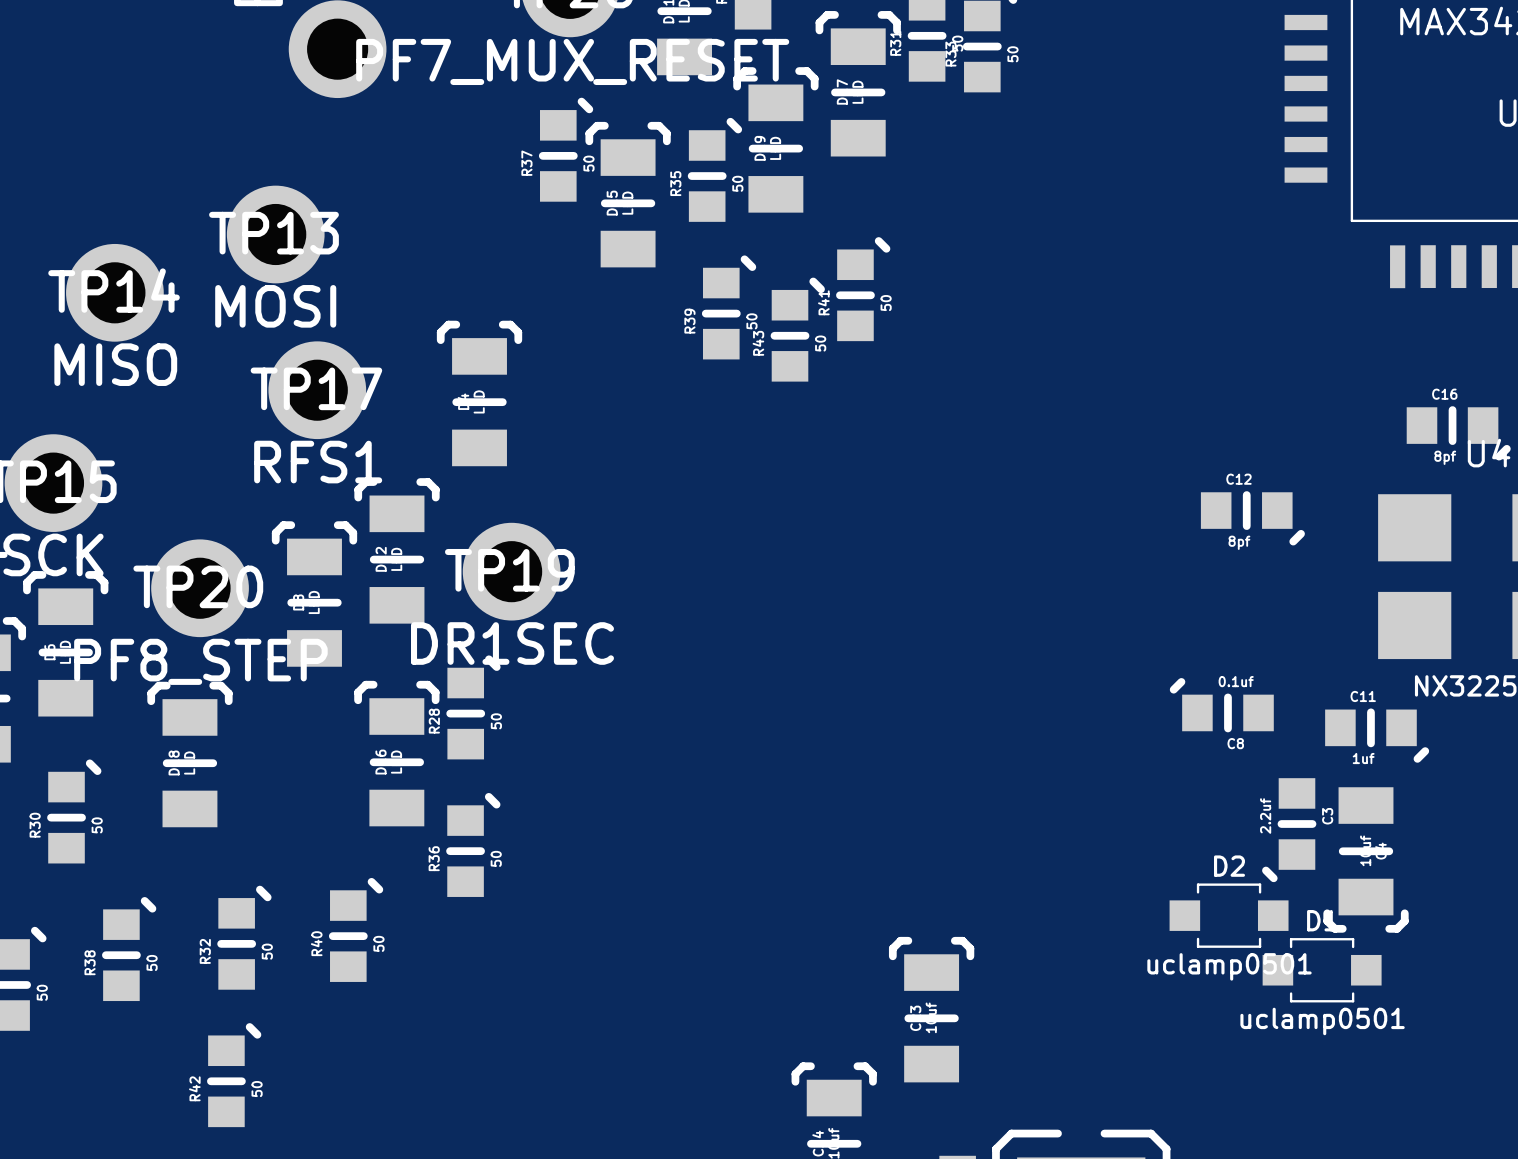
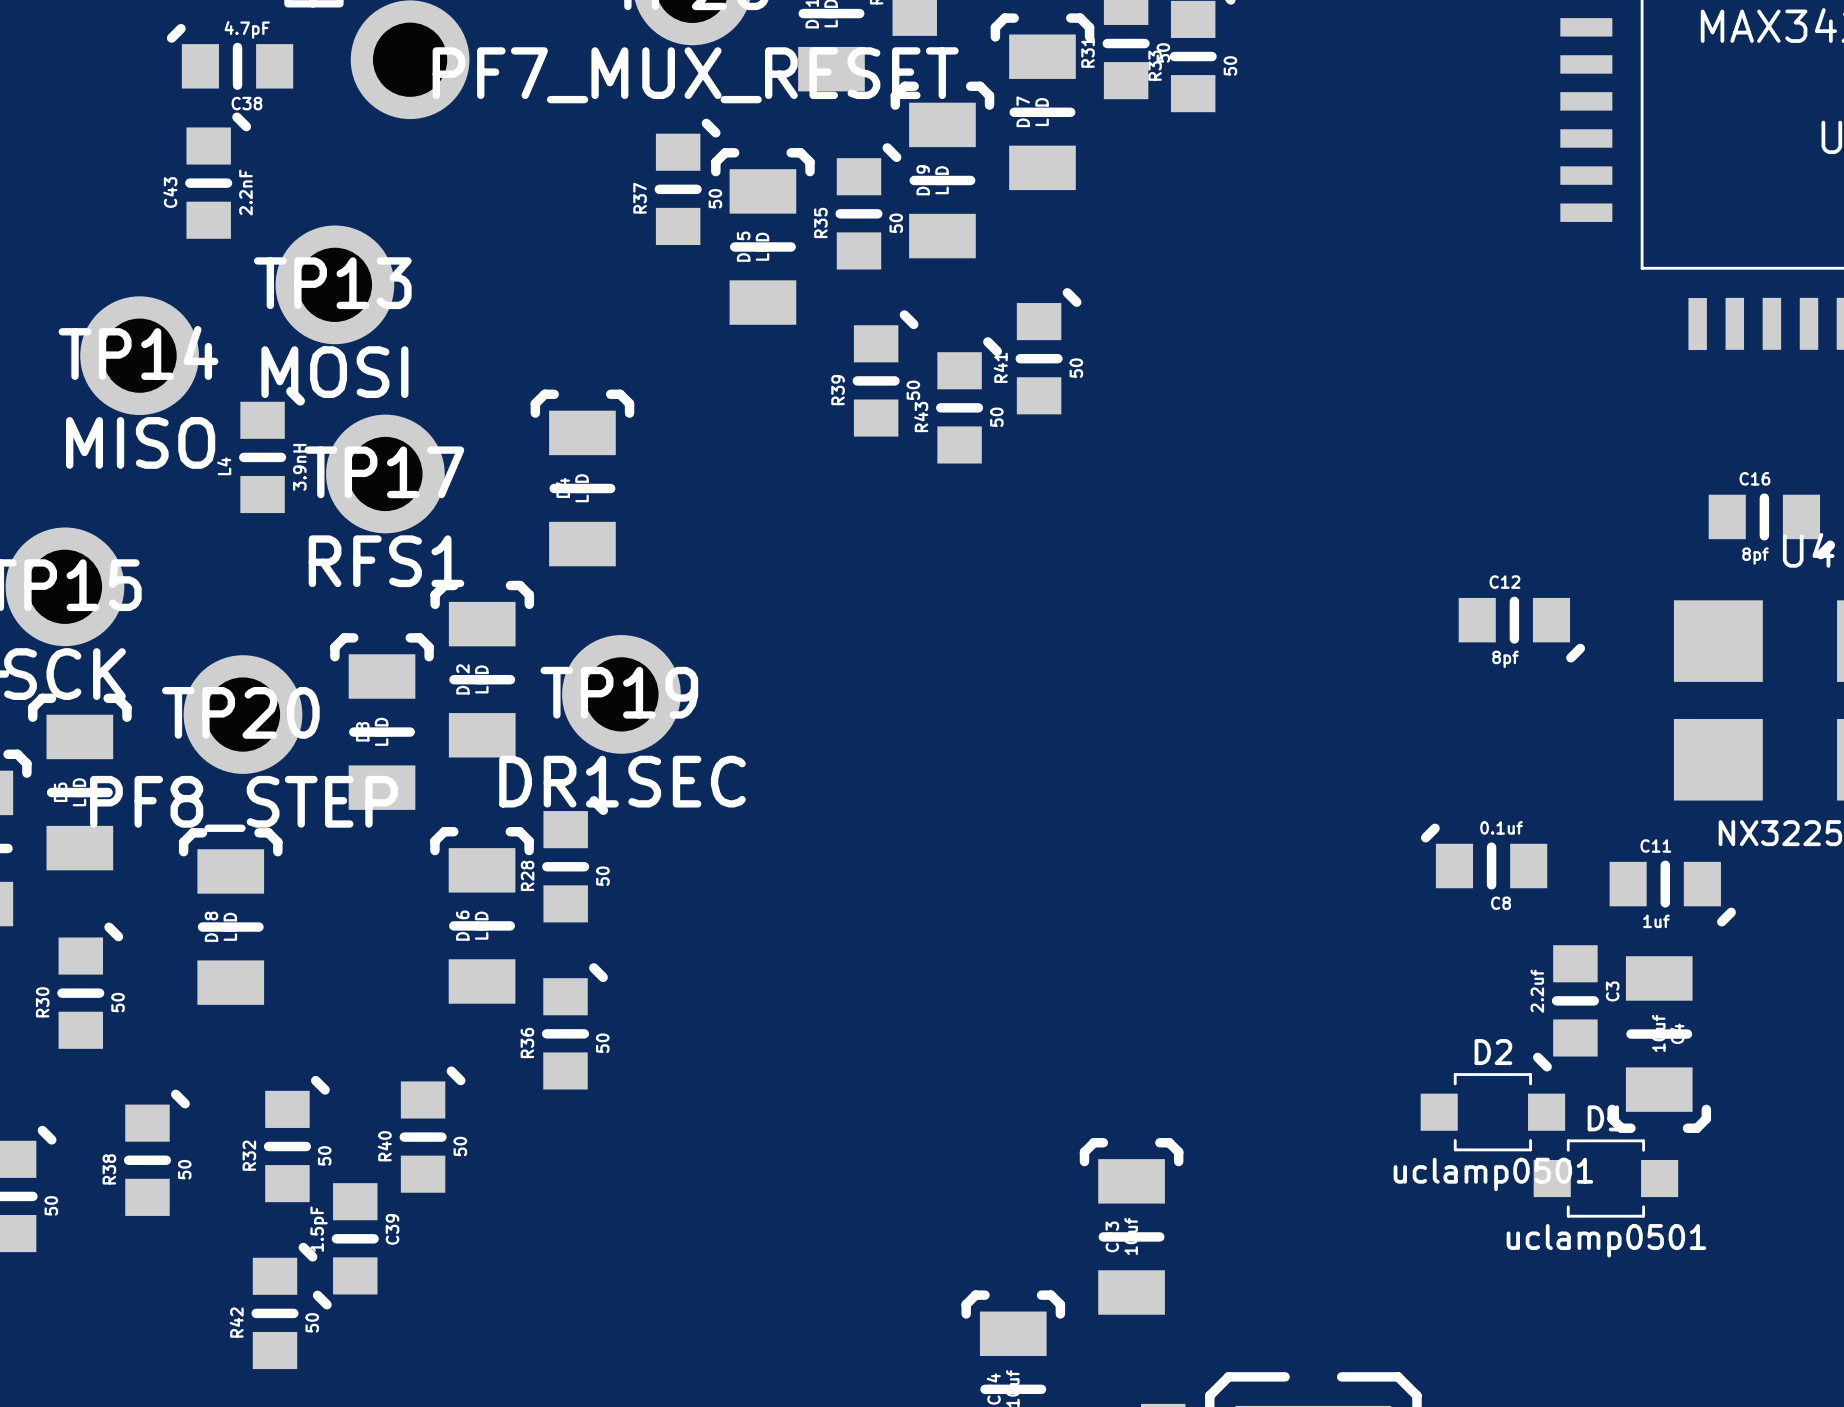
C38: none -> 4.7pF (230, 56)
C43: none -> 2.2nF (218, 175)
L4: none -> 3.9nH (272, 449)
C39: none -> 1.5pF (345, 1246)

